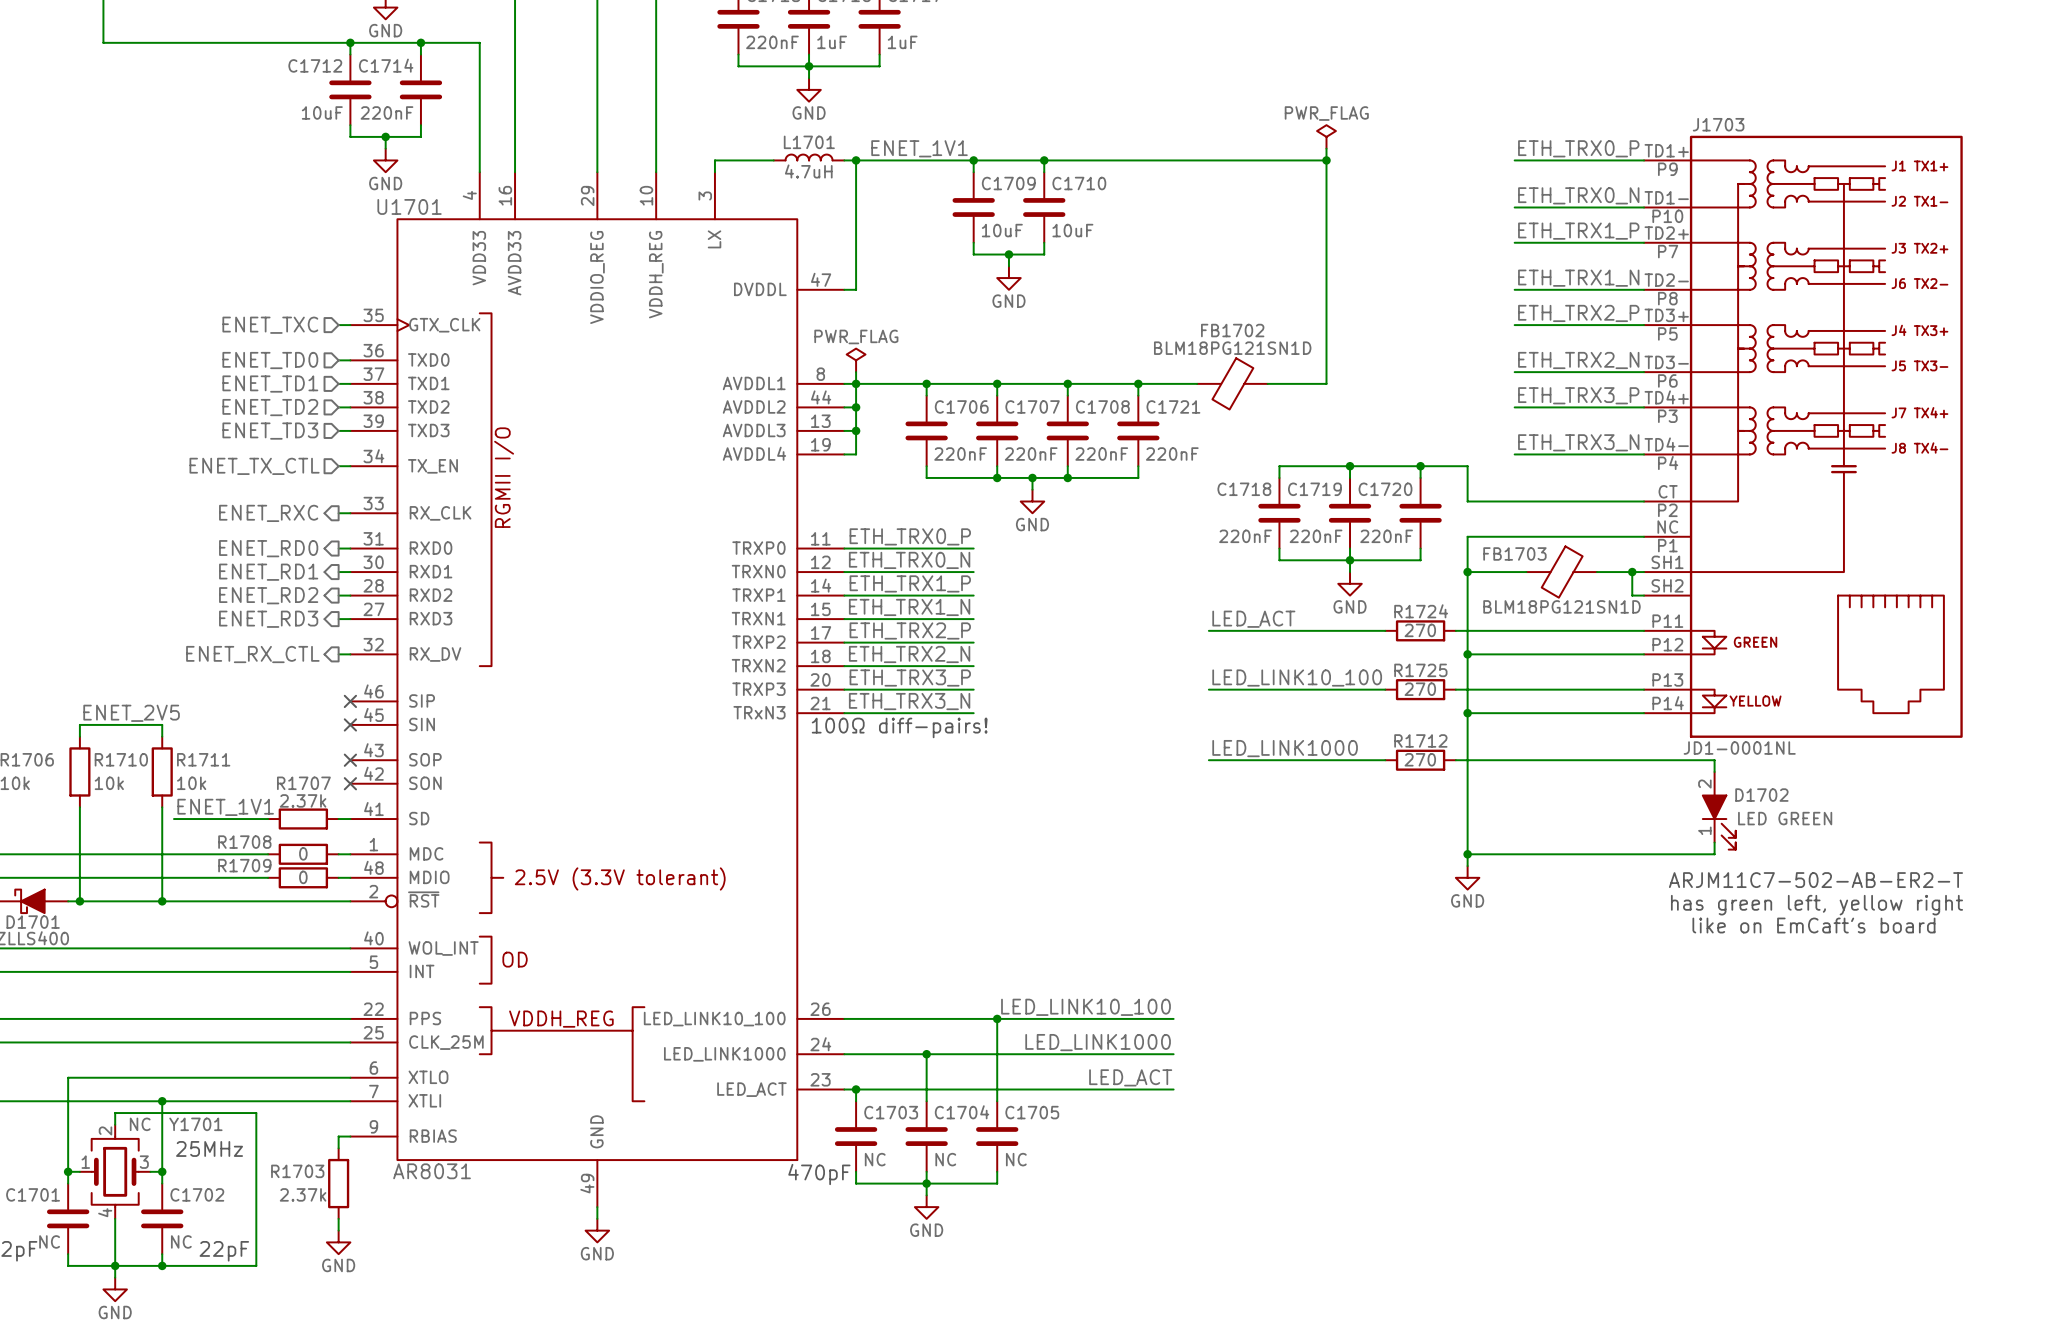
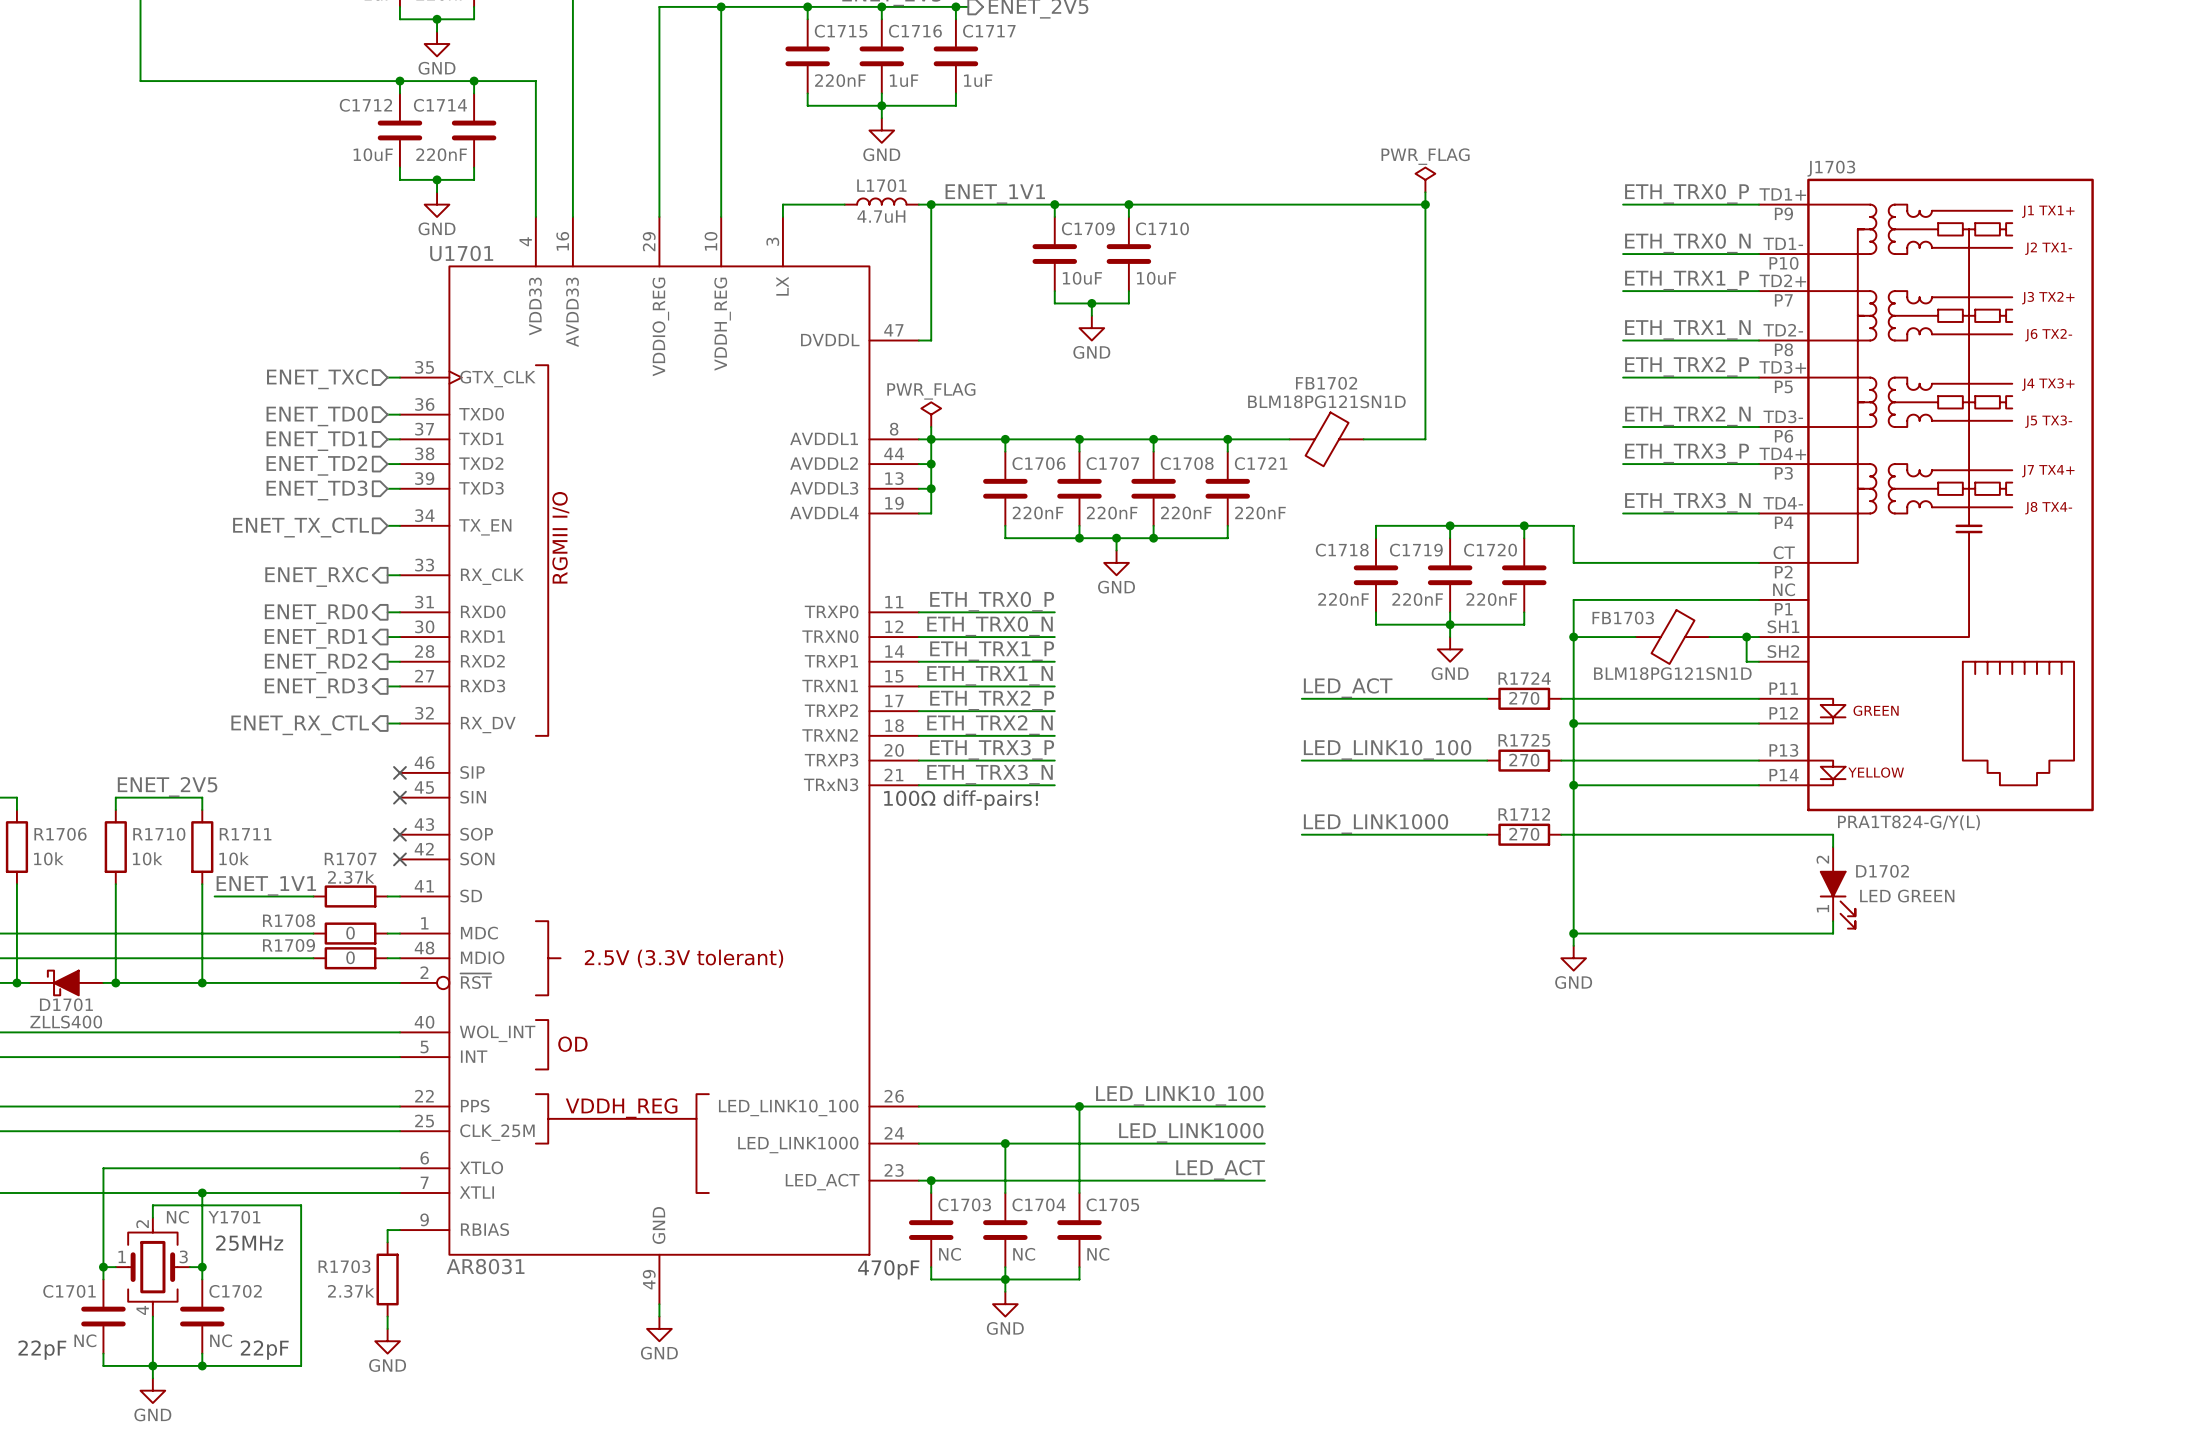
J1703 value: JD1-0001NL (1739, 748) -> PRA1T824-G/Y(L) (1908, 822)
text: ARJM11C7-502-AB-ER2-T (1815, 880) -> none
text: has green left, yellow right (1816, 905) -> none
text: like on EmCaft's board (1813, 925) -> none

